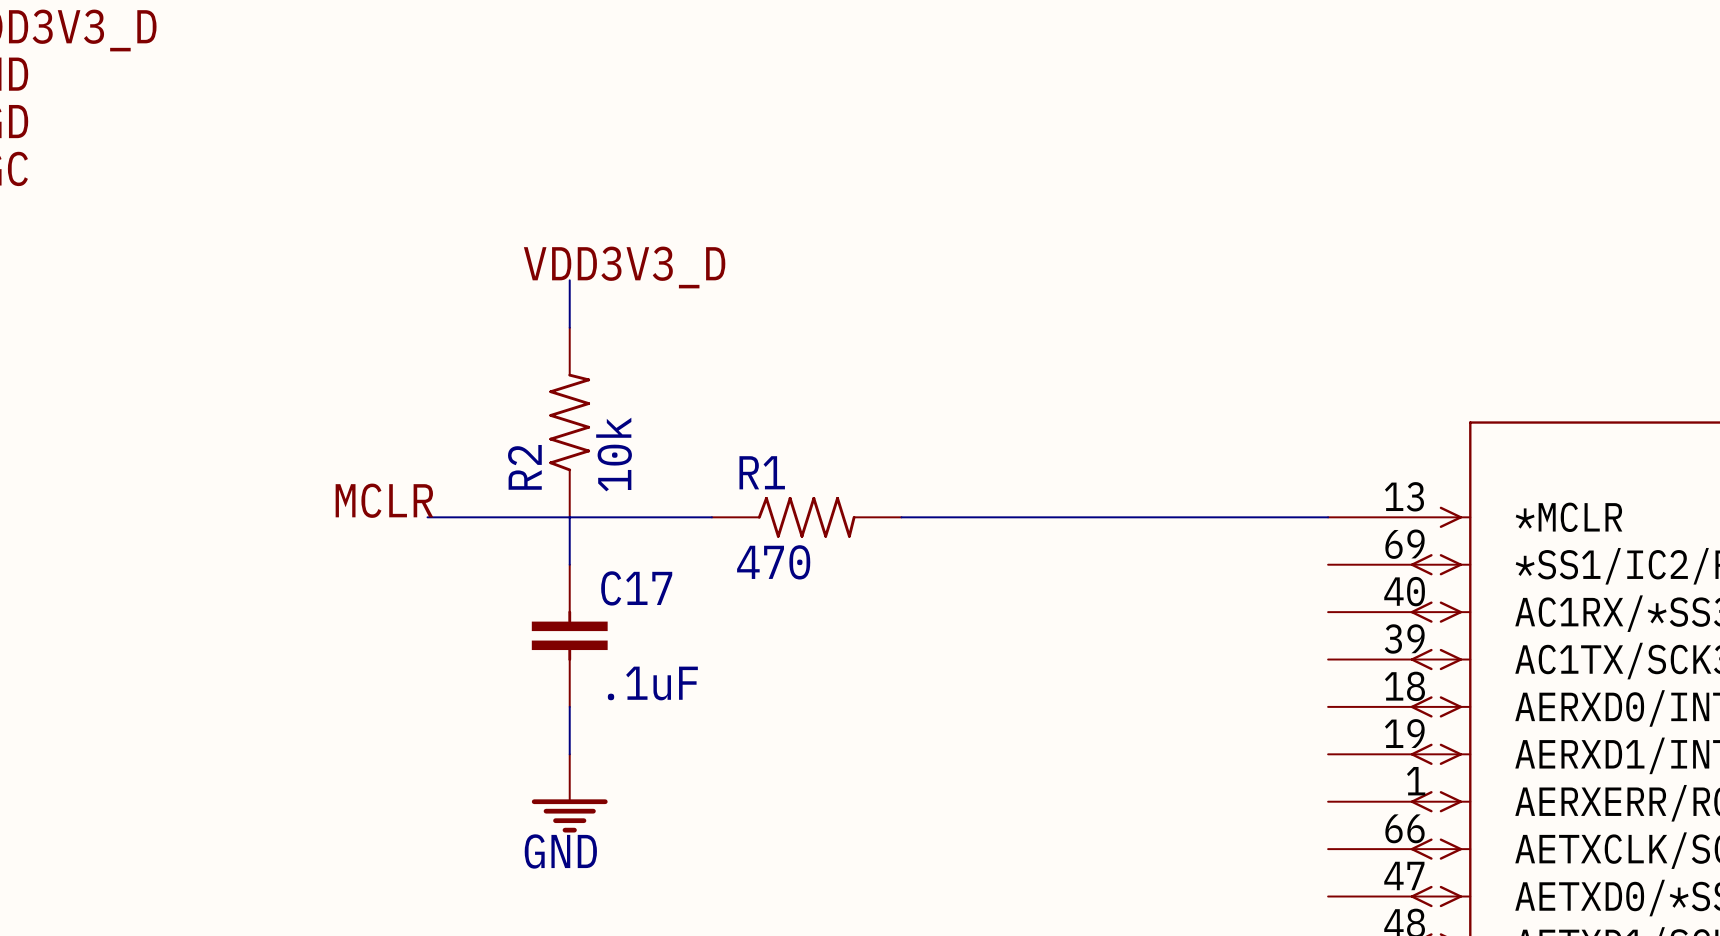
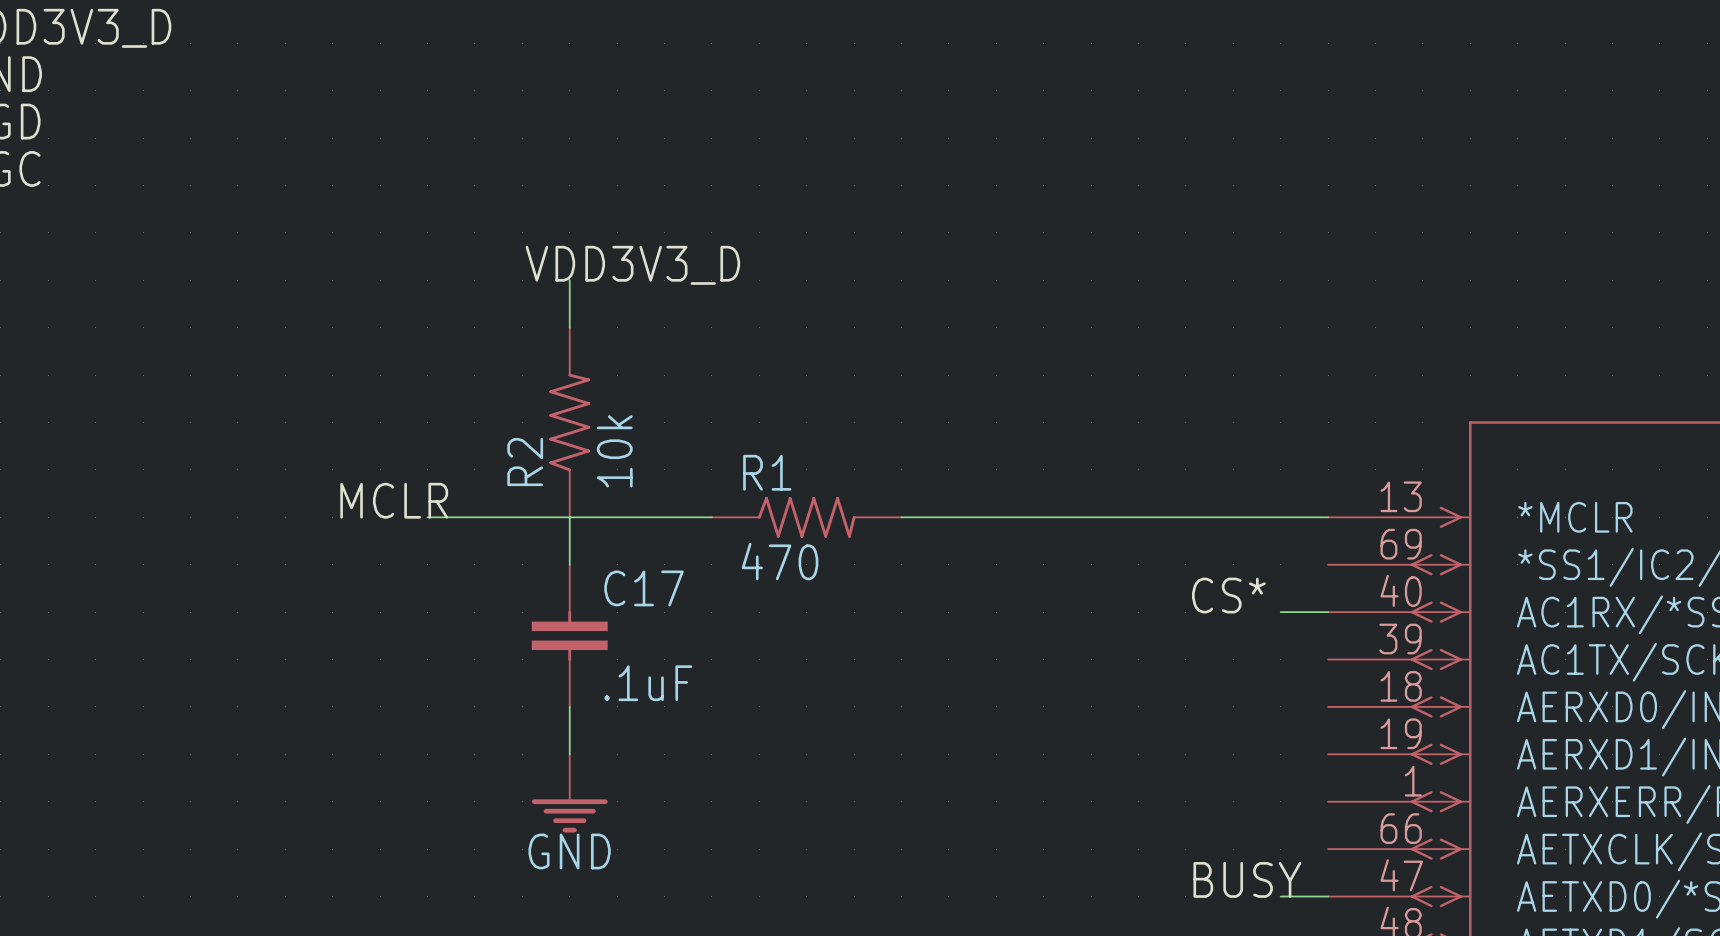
label: none -> CS* (1228, 595)
wire: none -> (1280, 612) (1328, 612)
label: none -> BUSY (1247, 879)
wire: none -> (1280, 896) (1328, 896)

